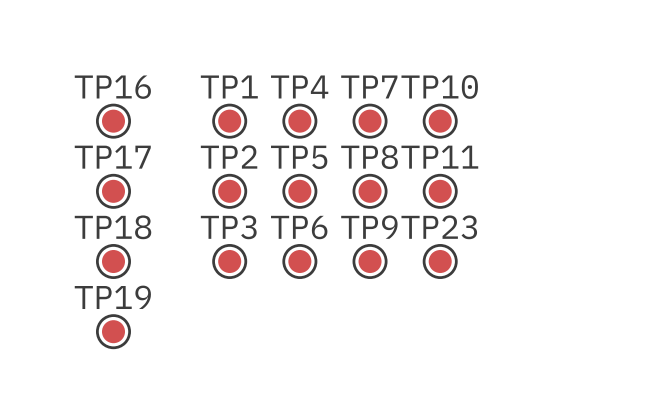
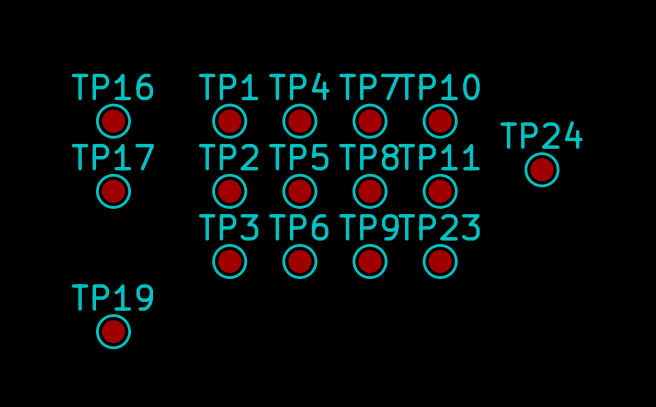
TP24: none -> (542, 169)
TP18: (113, 261) -> none

